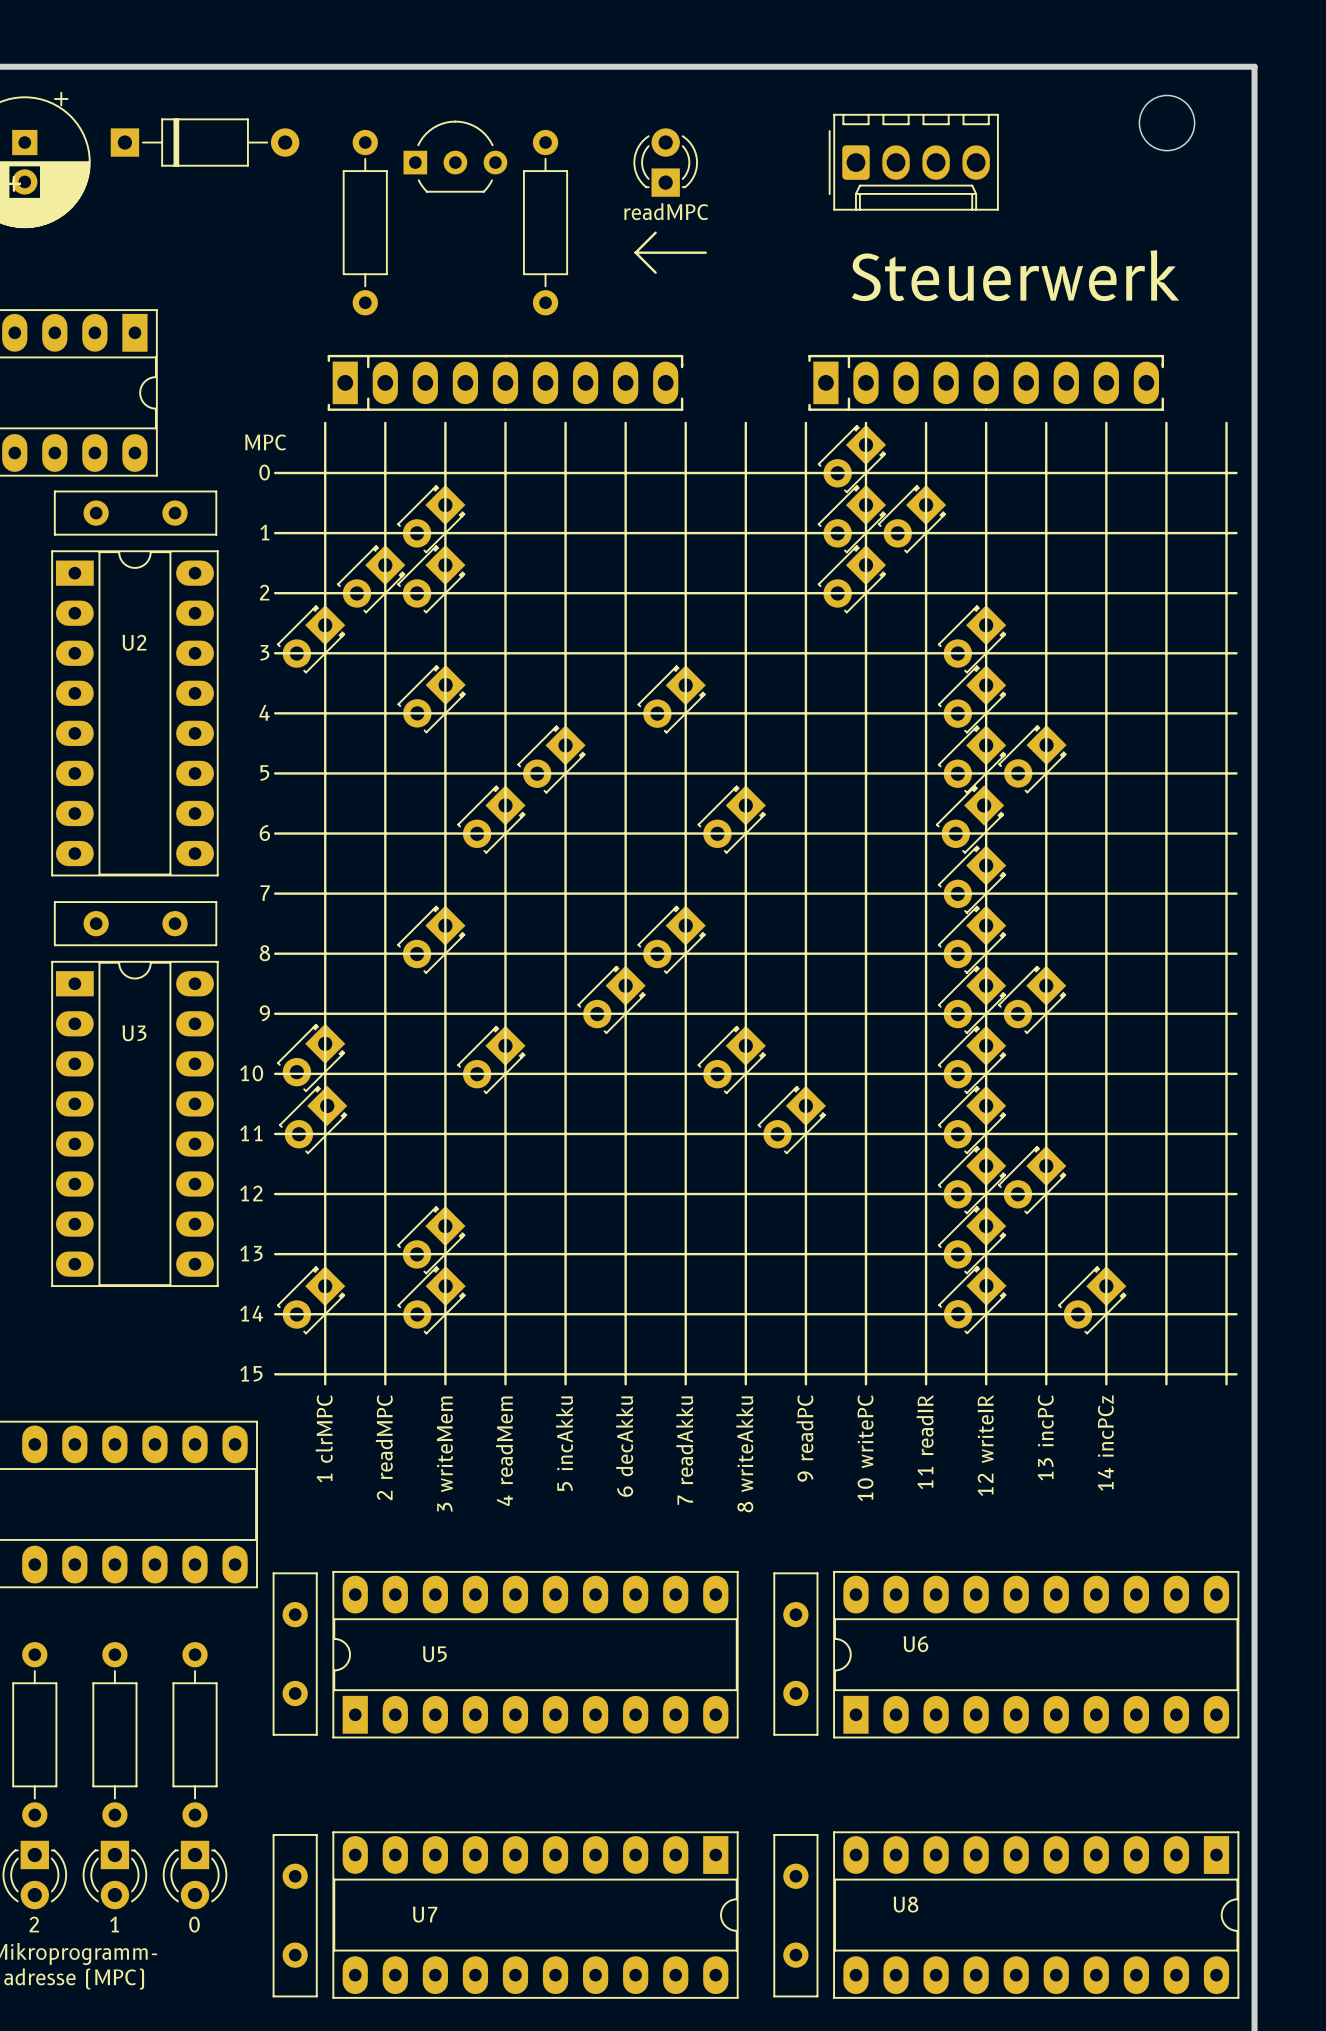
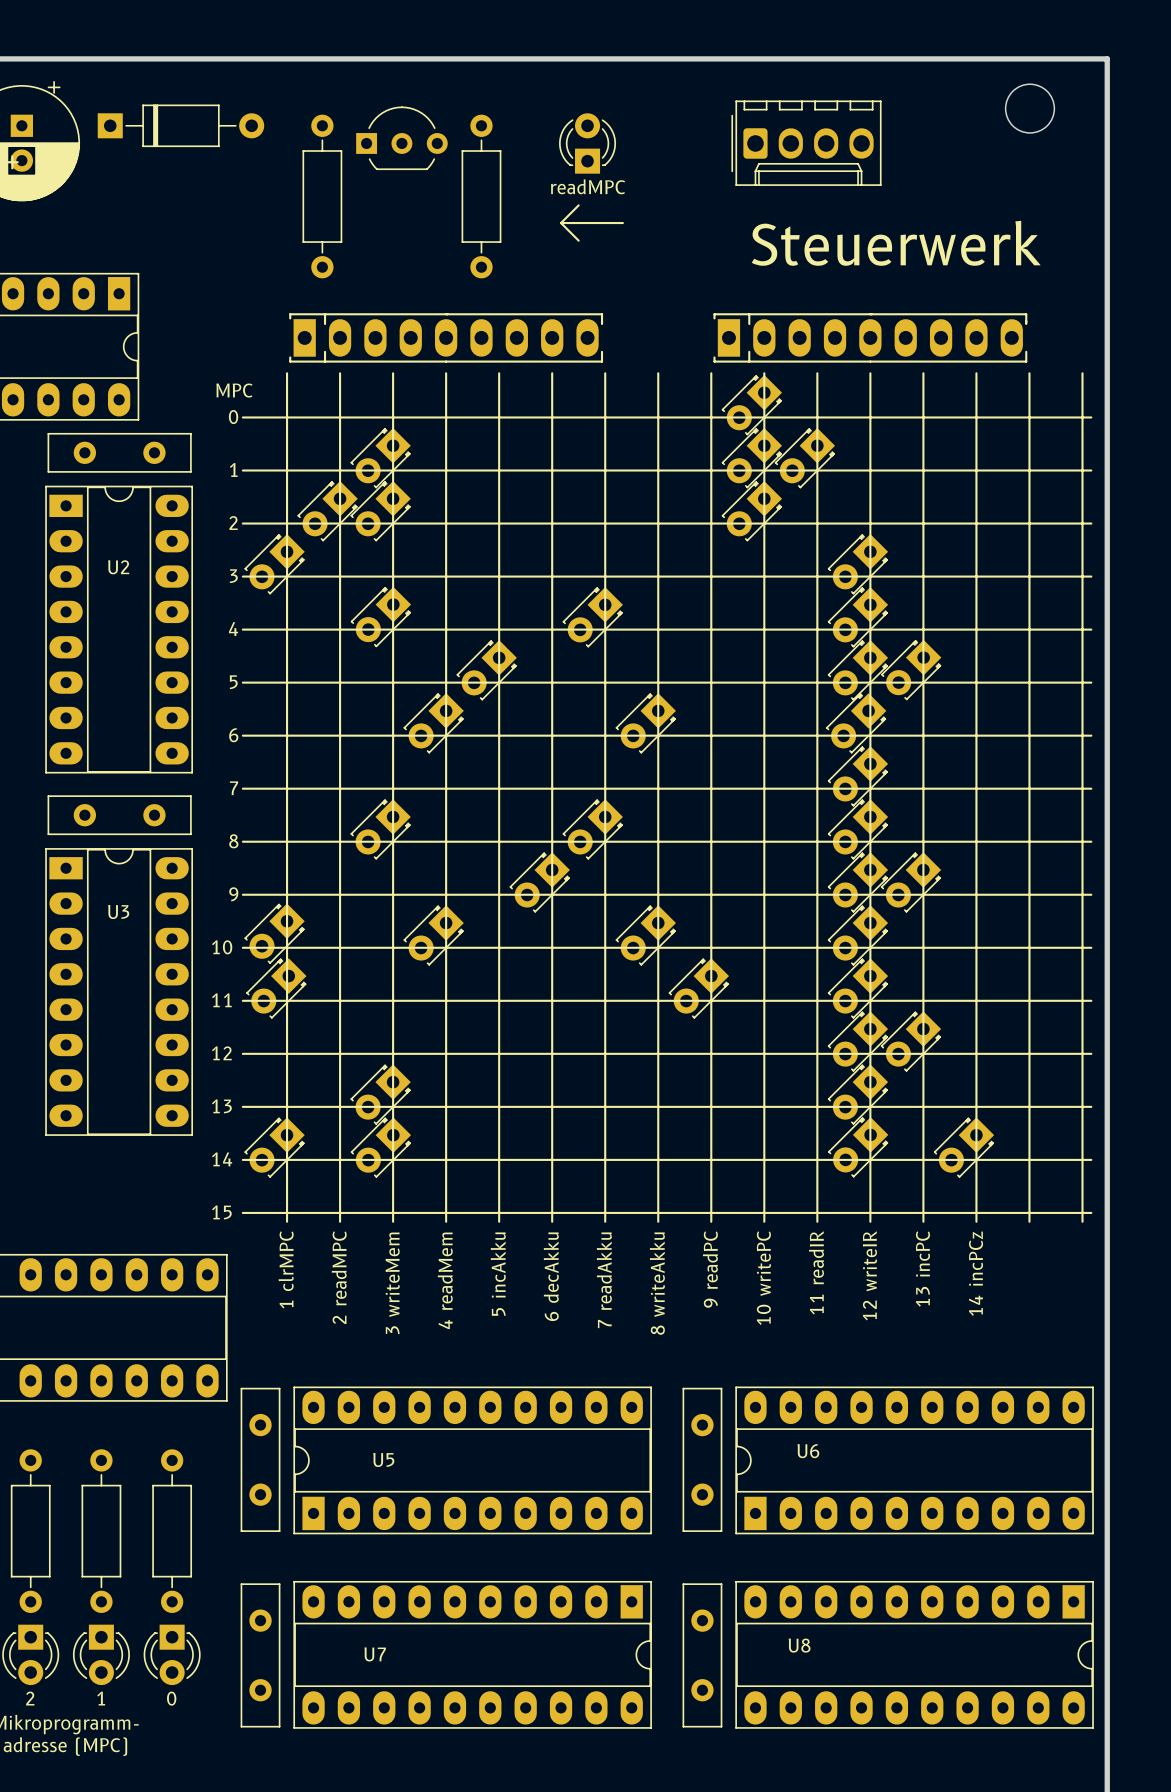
part position: (295, 1915) -> (260, 1655)
U7 position: (535, 1915) -> (472, 1654)
part position: (795, 1915) -> (702, 1655)
U8 position: (1036, 1915) -> (914, 1654)

